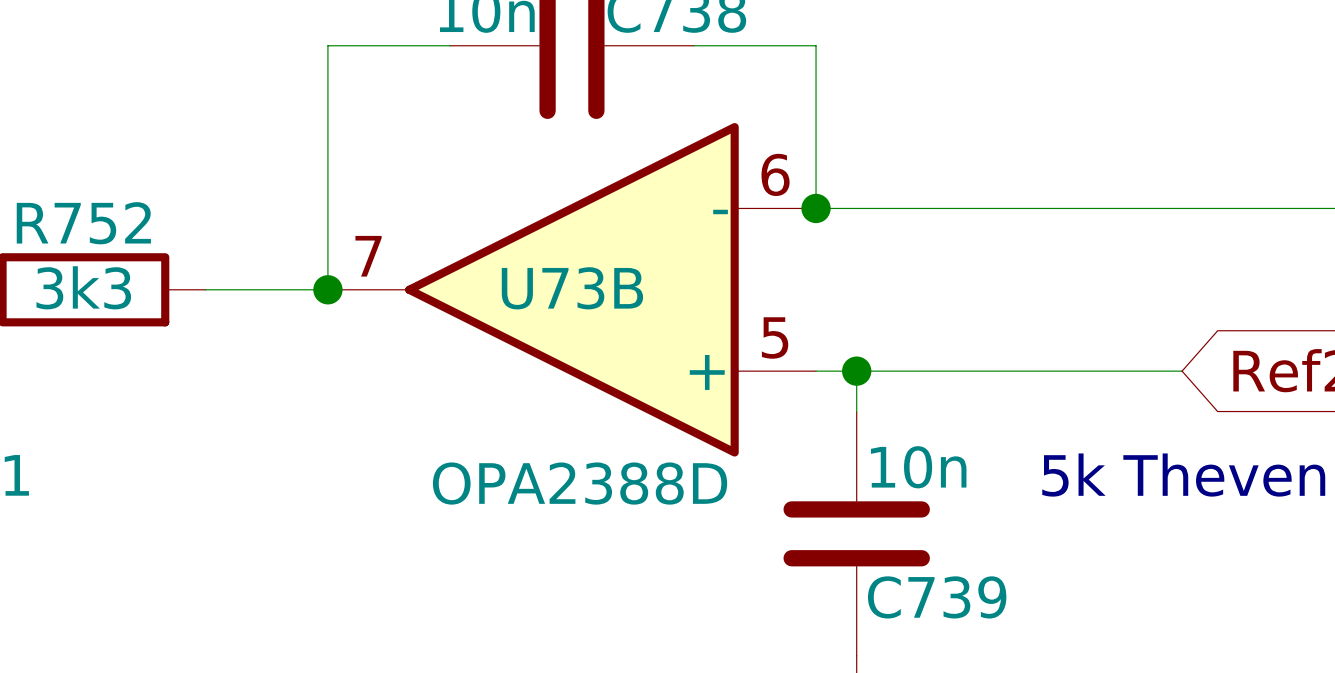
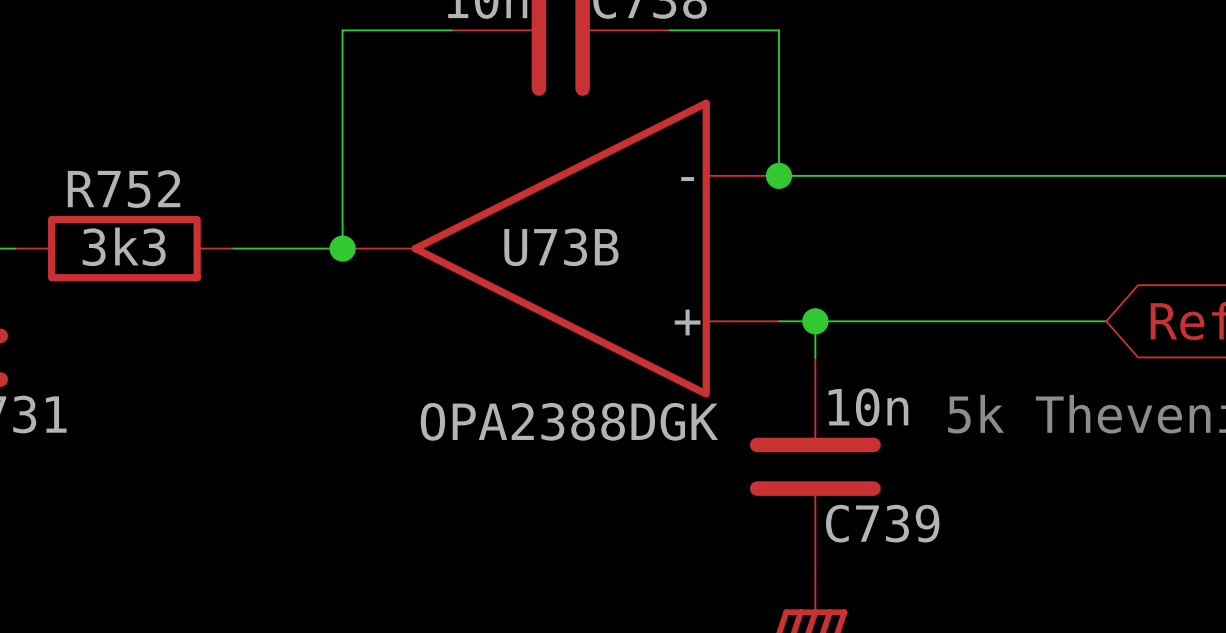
U73B pin number: 6 (775, 174) -> none
U73B pin number: 7 (368, 256) -> none
U73B pin number: 5 (775, 337) -> none
U73B value: OPA2388D (580, 483) -> OPA2388DGK (569, 421)

